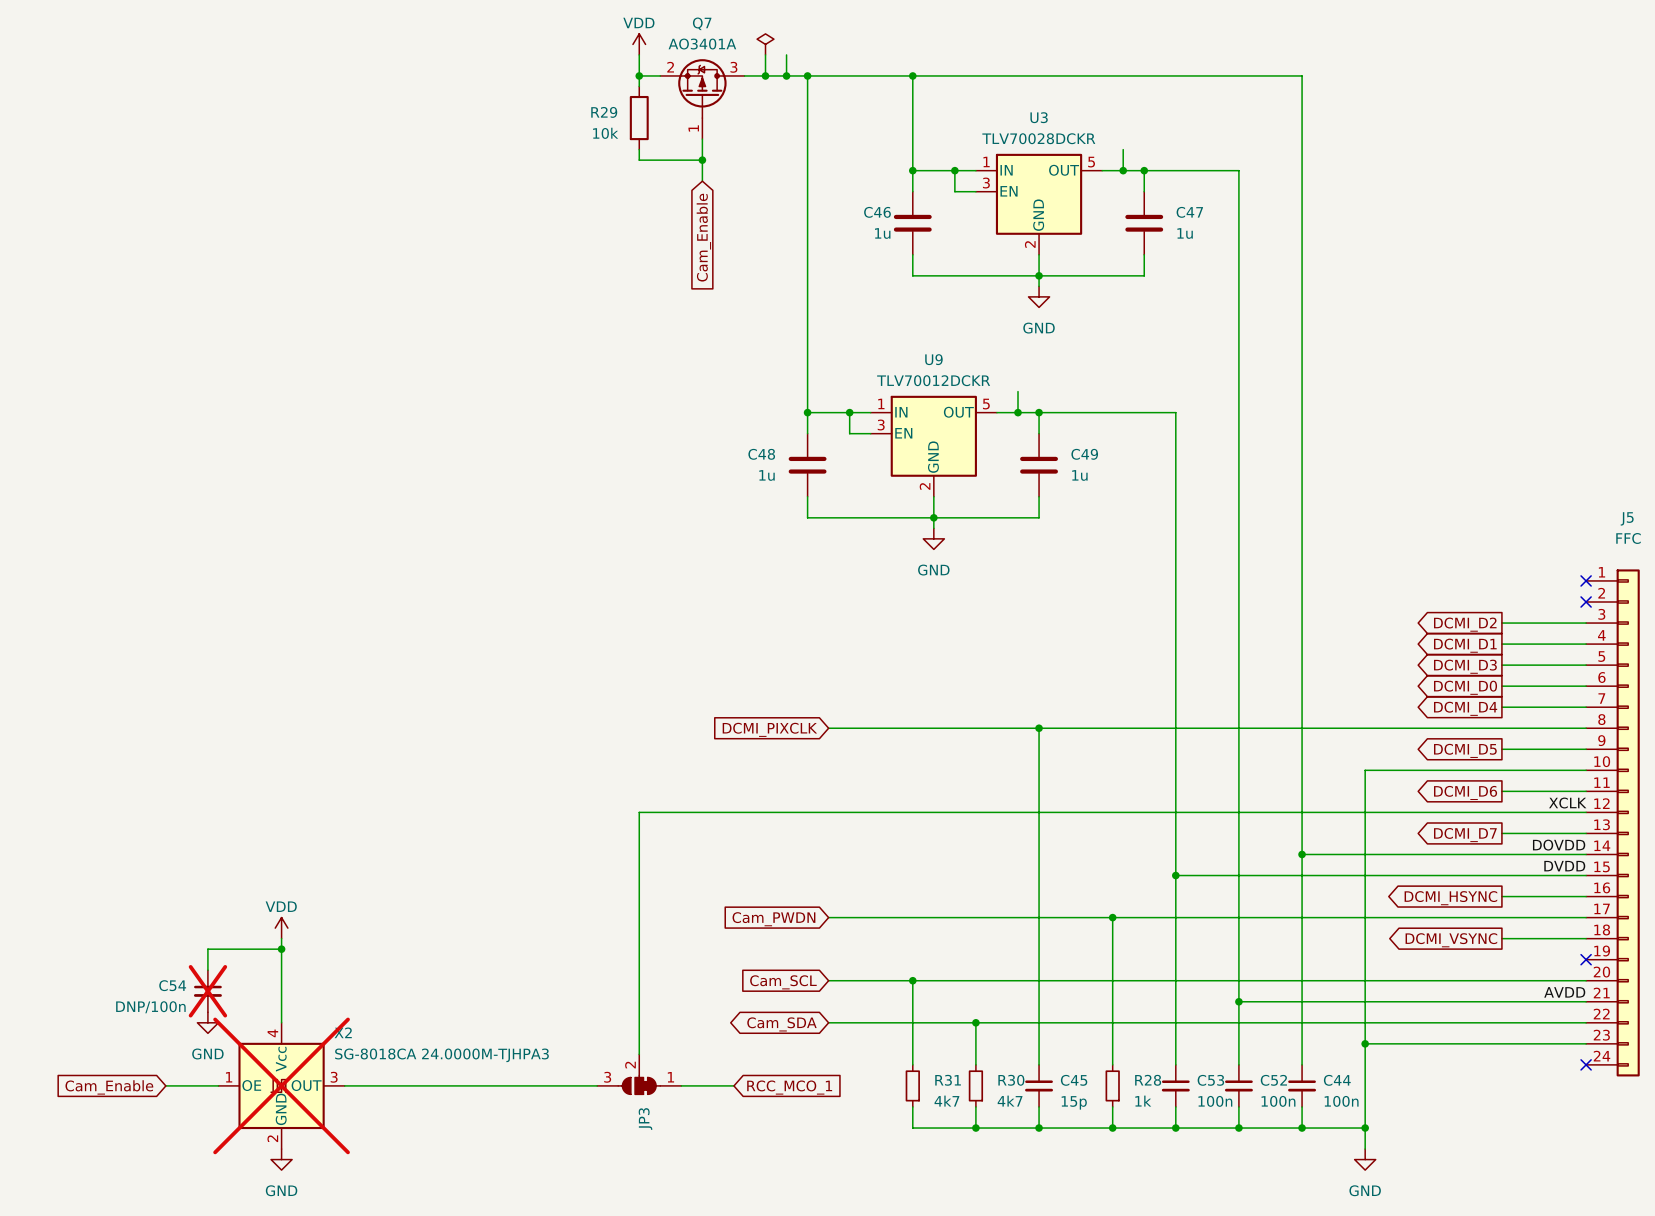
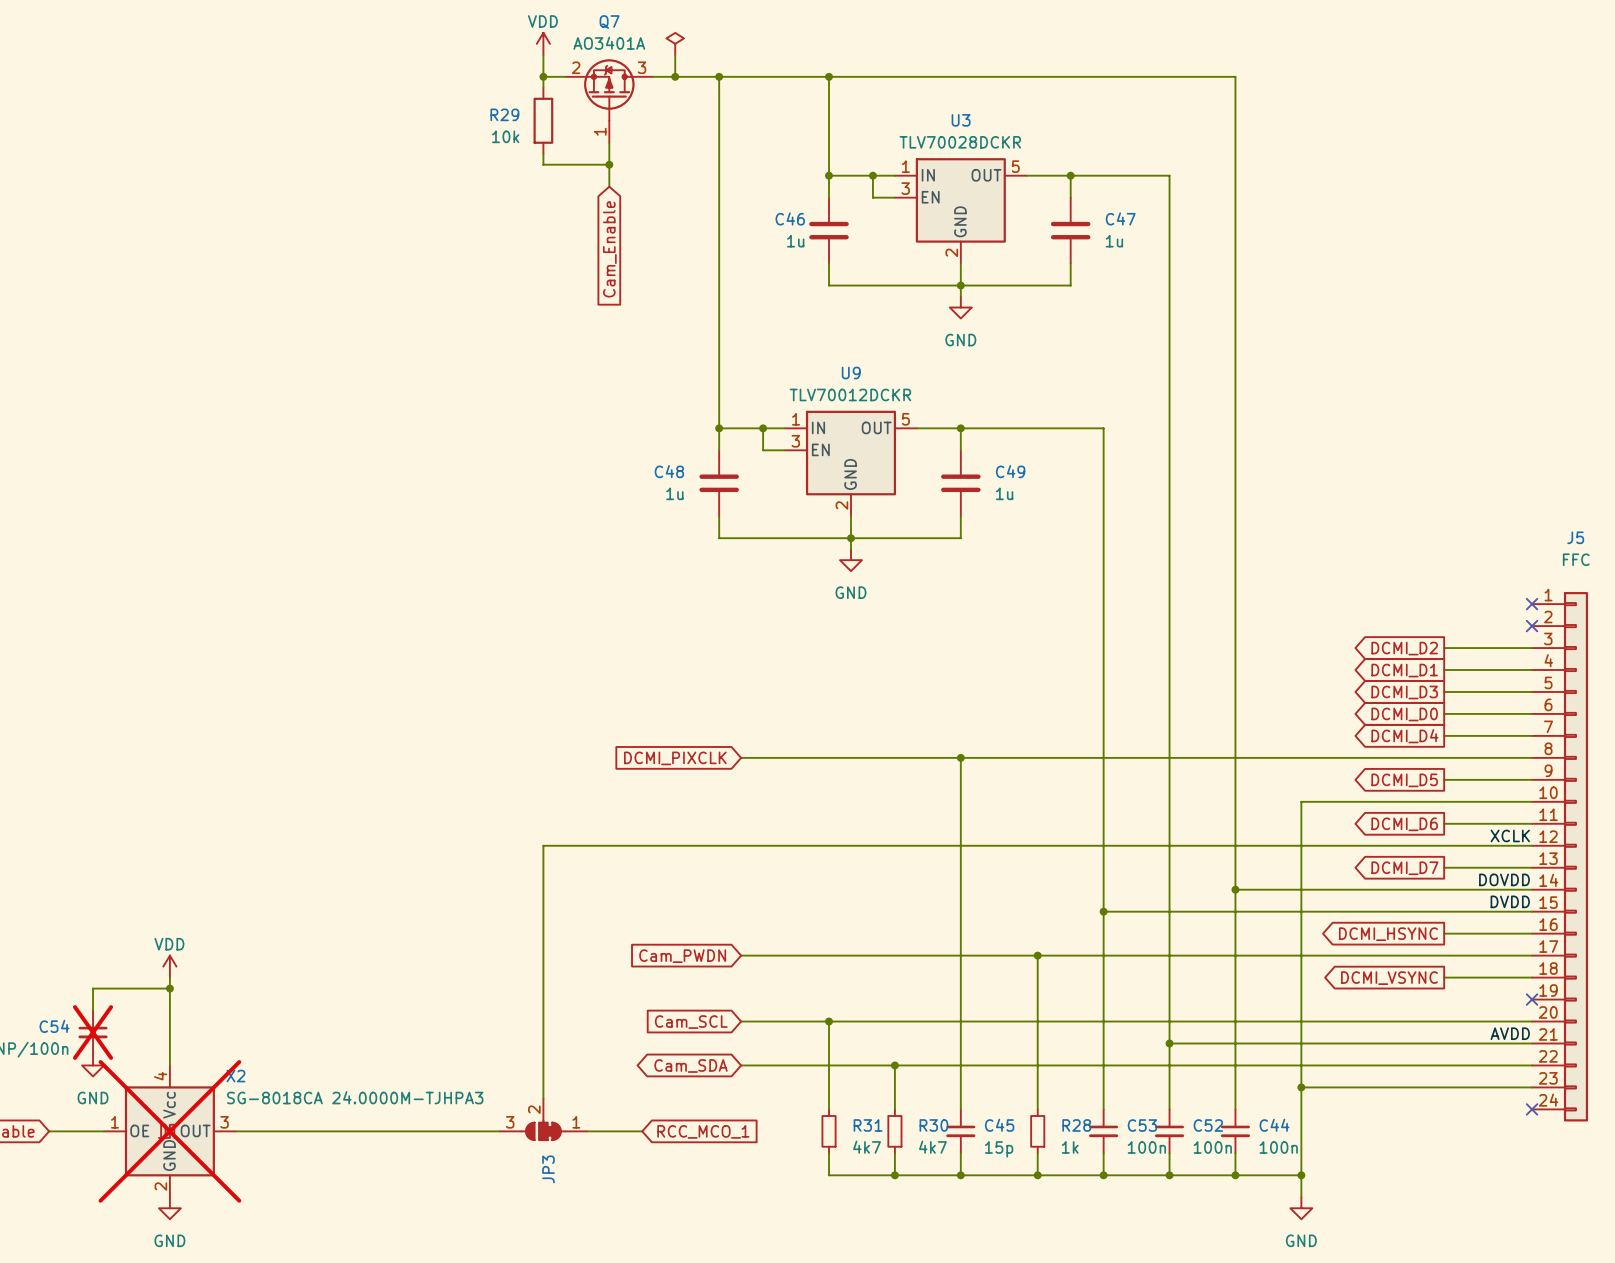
wire: (786, 54) (786, 75) -> none
junction: (786, 75) -> none
wire: (1123, 149) (1123, 170) -> none
junction: (1123, 170) -> none
wire: (1018, 391) (1018, 412) -> none
junction: (1018, 412) -> none

